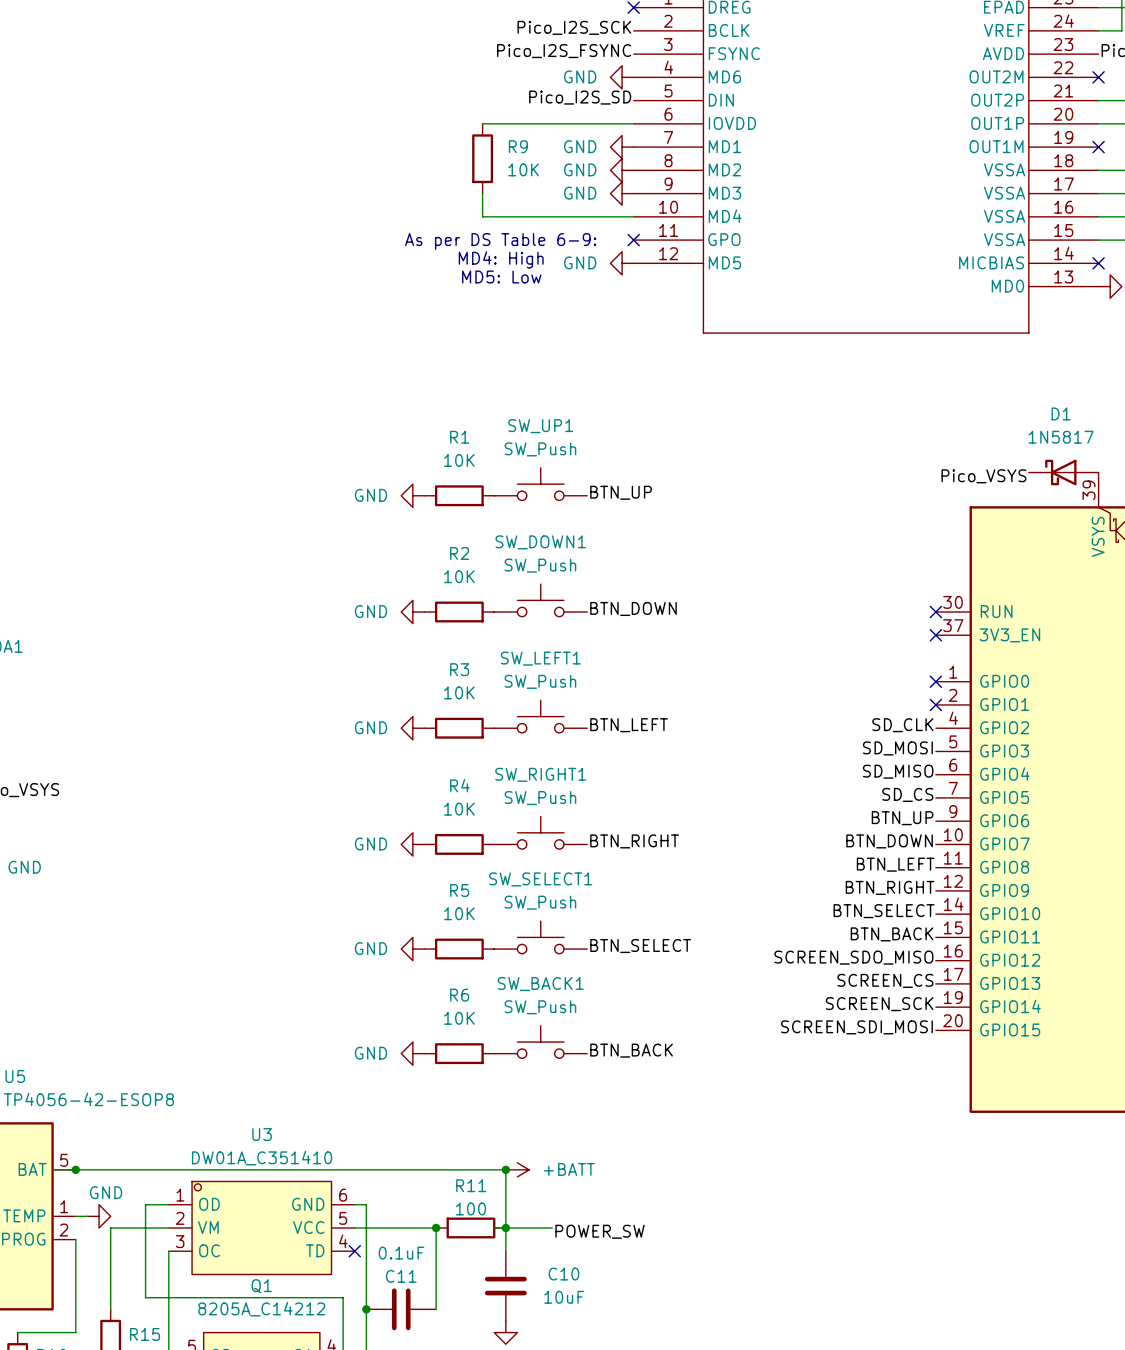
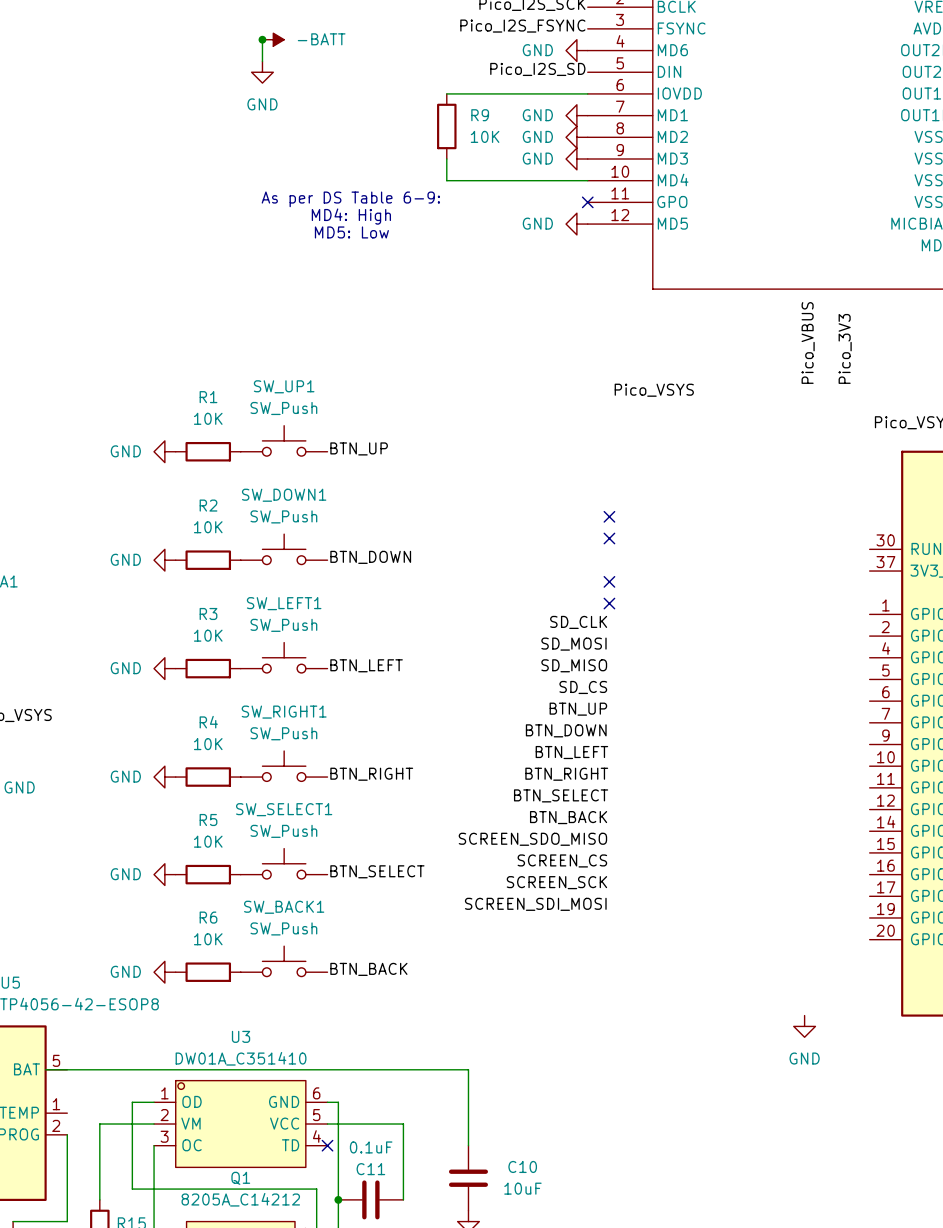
wire: none -> (262, 39) (262, 61)
junction: none -> (262, 39)
power symbol: none -> -BATT (273, 39)
power symbol: none -> GND (262, 72)
text position: As per DS Table 6-9: (500, 241) -> As per DS Table 6-9: (350, 199)
text position: MD4: High (501, 259) -> MD4: High (351, 216)
text position: MD5: Low (501, 276) -> MD5: Low (351, 232)
label: none -> Pico_VBUS (808, 342)
label: none -> Pico_3V3 (845, 348)
label: none -> Pico_VSYS (654, 390)
SW_UP1 position: (540, 484) -> (284, 440)
label: BTN_UP (621, 492) -> none
power symbol: GND (412, 495) -> none
R1 position: (459, 495) -> (208, 451)
label: none -> BTN_UP (359, 448)
power symbol: none -> GND (164, 451)
no-connect mark: none -> (609, 516)
SW_DOWN1 position: (540, 600) -> (284, 549)
no-connect mark: none -> (609, 538)
label: BTN_DOWN (633, 608) -> none
power symbol: GND (412, 611) -> none
R2 position: (459, 611) -> (208, 560)
no-connect mark: (935, 611) -> none
label: none -> BTN_DOWN (370, 557)
power symbol: none -> GND (164, 560)
no-connect mark: (935, 635) -> none
no-connect mark: none -> (609, 581)
no-connect mark: none -> (609, 603)
no-connect mark: (935, 681) -> none
label: none -> SD_CLK (578, 622)
no-connect mark: (935, 704) -> none
label: none -> SD_MOSI (573, 644)
SW_LEFT1 position: (540, 716) -> (284, 657)
label: BTN_LEFT (629, 725) -> none
label: SD_CLK (902, 725) -> none
power symbol: GND (412, 728) -> none
R3 position: (459, 728) -> (208, 668)
label: none -> BTN_LEFT (366, 665)
label: none -> SD_MISO (574, 665)
power symbol: none -> GND (164, 668)
label: SD_MOSI (897, 748) -> none
label: none -> SD_CS (583, 687)
label: SD_MISO (898, 771) -> none
label: none -> BTN_UP (578, 709)
label: SD_CS (907, 794) -> none
label: none -> BTN_DOWN (566, 730)
label: BTN_UP (902, 818) -> none
label: none -> BTN_LEFT (571, 752)
SW_RIGHT1 position: (540, 832) -> (284, 766)
label position: BTN_RIGHT (634, 841) -> BTN_RIGHT (566, 774)
label: BTN_DOWN (889, 841) -> none
power symbol: GND (412, 844) -> none
R4 position: (459, 844) -> (208, 777)
label: none -> BTN_RIGHT (371, 774)
power symbol: none -> GND (164, 777)
label: BTN_LEFT (895, 864) -> none
label: BTN_RIGHT (890, 887) -> none
label: none -> BTN_BACK (568, 817)
label: BTN_SELECT (884, 911) -> none
label: none -> SCREEN_SDO_MISO (532, 839)
label: BTN_BACK (892, 934) -> none
SW_SELECT1 position: (540, 937) -> (284, 863)
label: none -> SCREEN_CS (562, 860)
label position: BTN_SELECT (640, 946) -> BTN_SELECT (561, 795)
power symbol: GND (412, 949) -> none
R5 position: (459, 949) -> (208, 874)
label: none -> BTN_SELECT (377, 871)
label: SCREEN_SDO_MISO (853, 957) -> none
power symbol: none -> GND (164, 874)
label: none -> SCREEN_SCK (556, 882)
label: SCREEN_CS (885, 980) -> none
label: none -> SCREEN_SDI_MOSI (535, 904)
label: SCREEN_SCK (879, 1004) -> none
label: SCREEN_SDI_MOSI (856, 1027) -> none
SW_BACK1 position: (540, 1042) -> (284, 961)
label: BTN_BACK (631, 1050) -> none
power symbol: GND (412, 1053) -> none
R6 position: (459, 1053) -> (208, 972)
label: none -> BTN_BACK (368, 969)
power symbol: none -> GND (164, 972)
power symbol: none -> GND (804, 1026)
junction: (75, 1169) -> none
junction: (505, 1169) -> none
power symbol: +BATT (517, 1169) -> none
wire: (75, 1216) (87, 1216) -> none
power symbol: GND (99, 1216) -> none
junction: (436, 1227) -> none
R11: 100 (470, 1227) -> none
wire: (494, 1227) (552, 1227) -> none
junction: (505, 1227) -> none
label: POWER_SW (600, 1231) -> none

